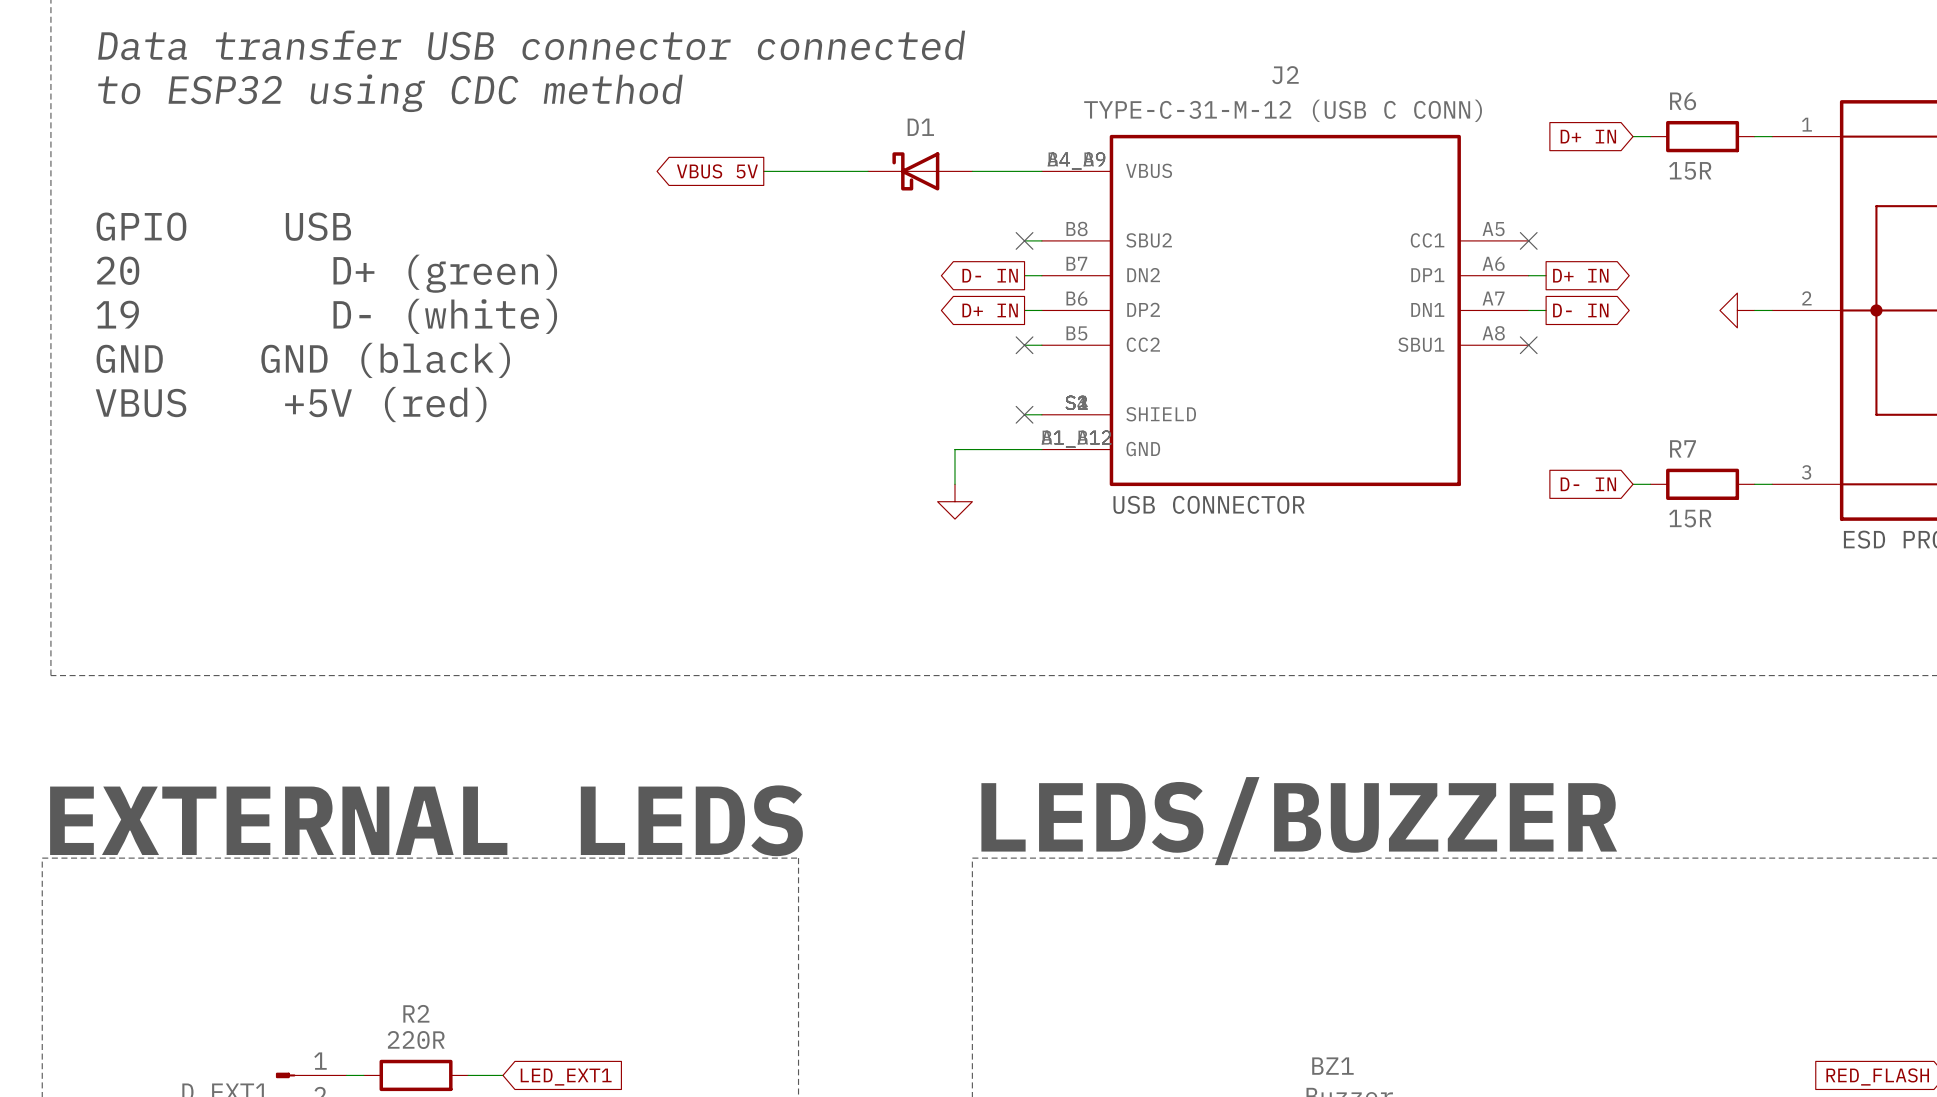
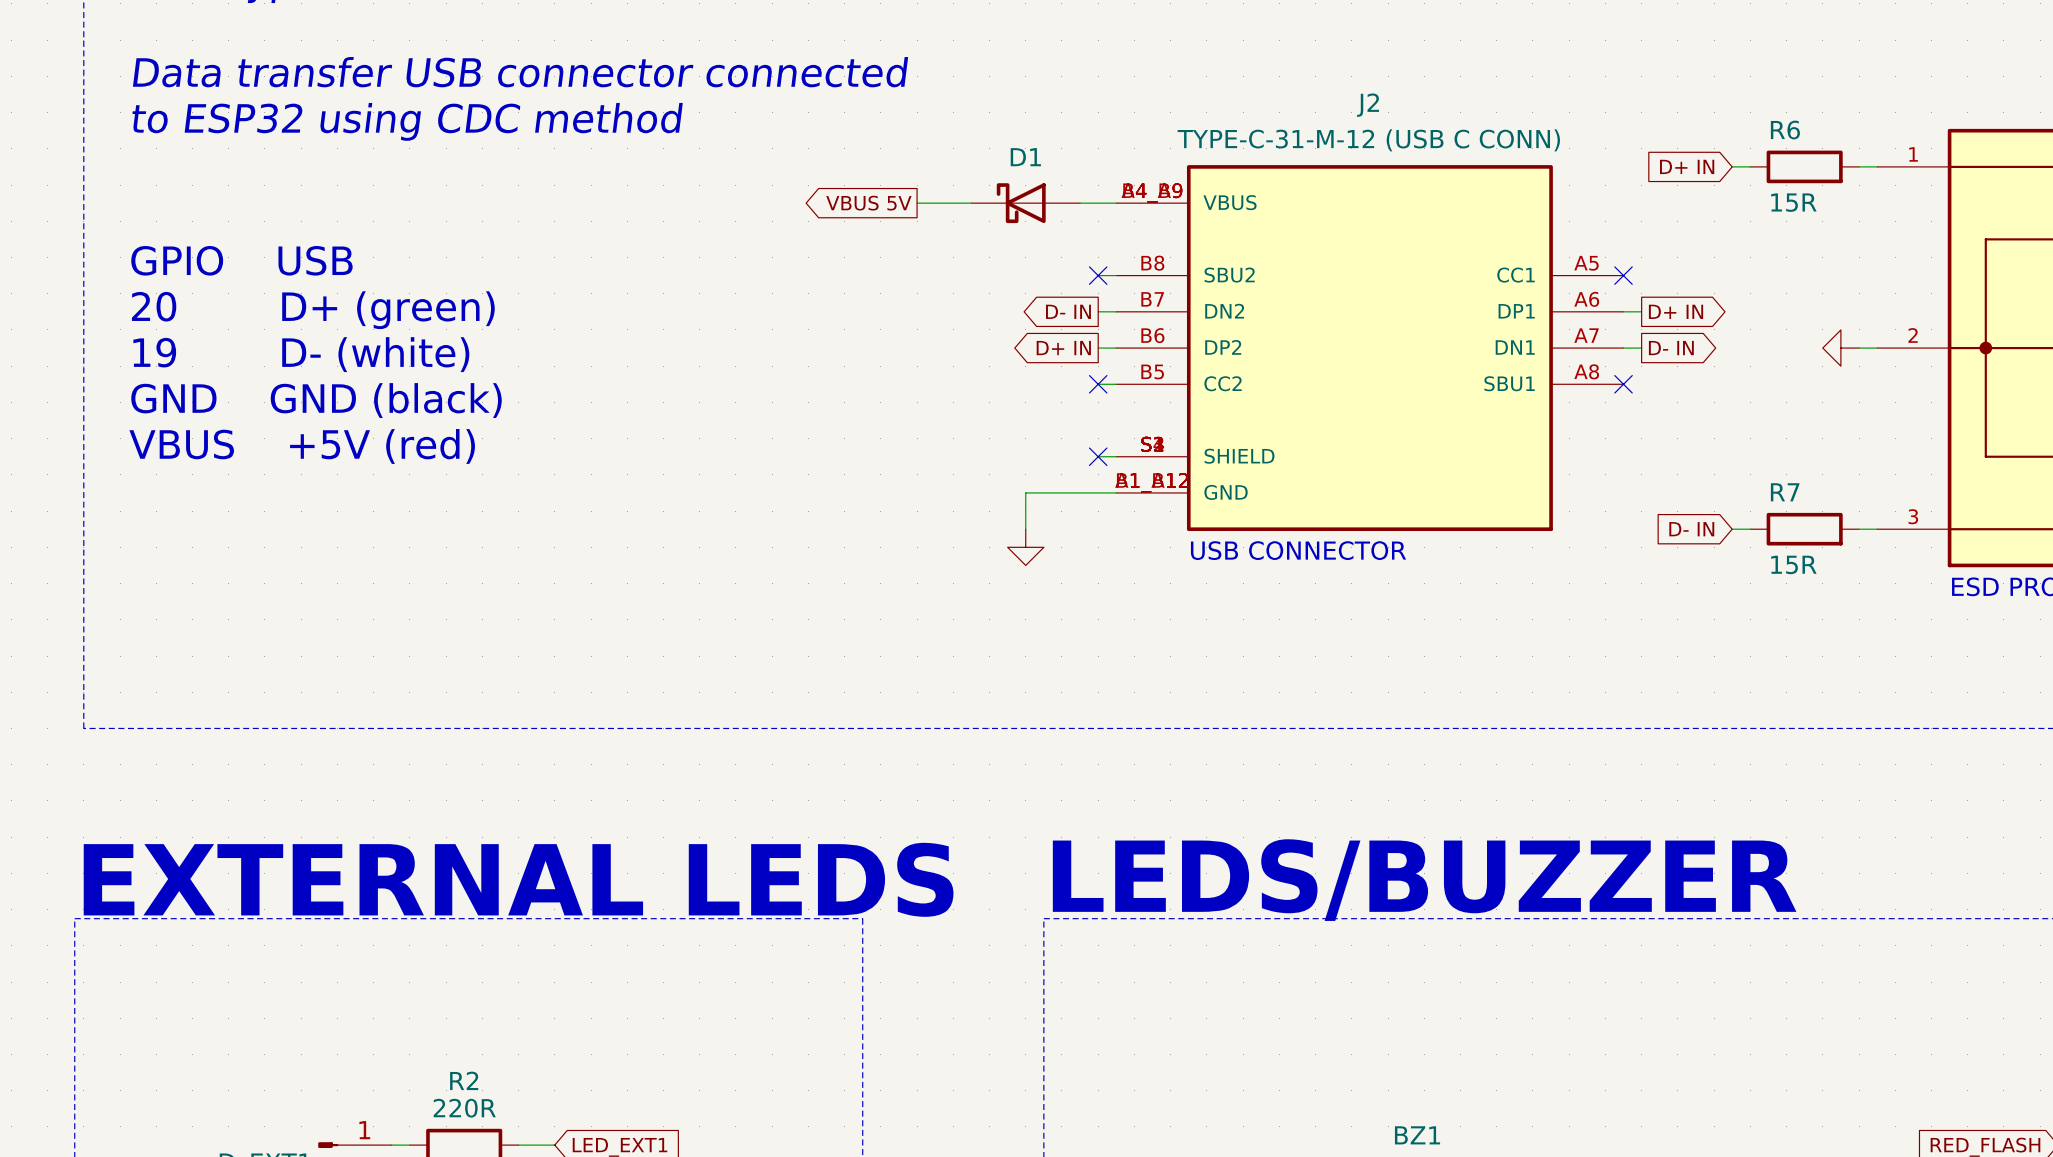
global label position: VBUS 5V (717, 171) -> VBUS 5V (868, 203)
wire: (763, 171) (850, 171) -> none
D1 position: (920, 171) -> (1025, 203)

